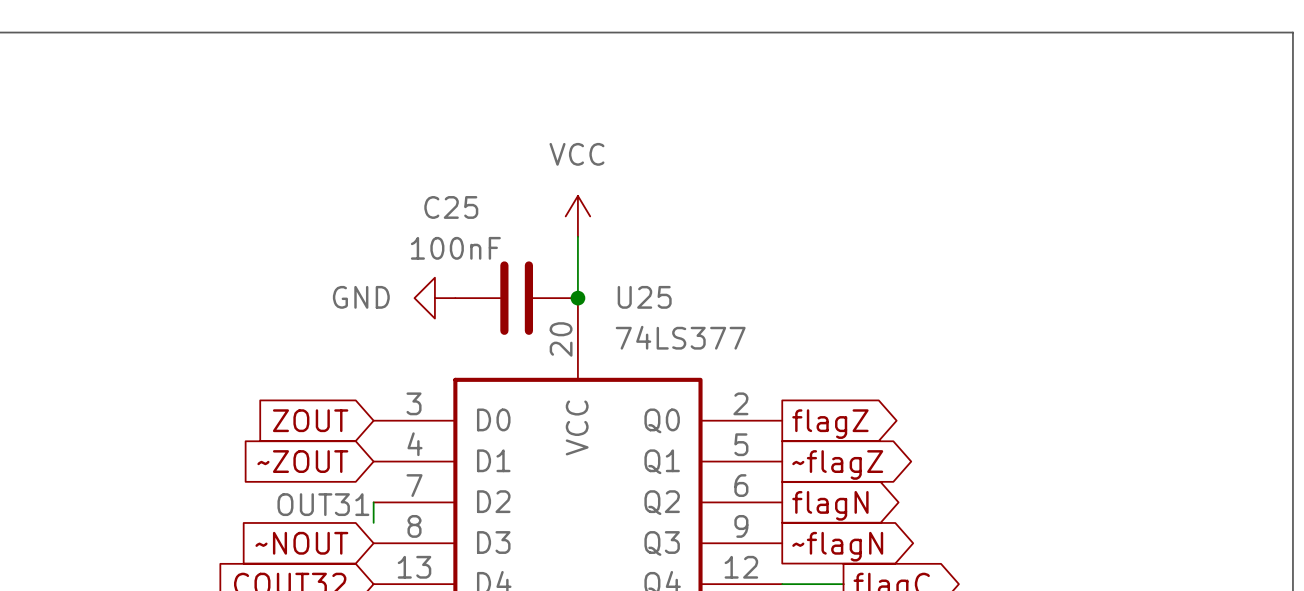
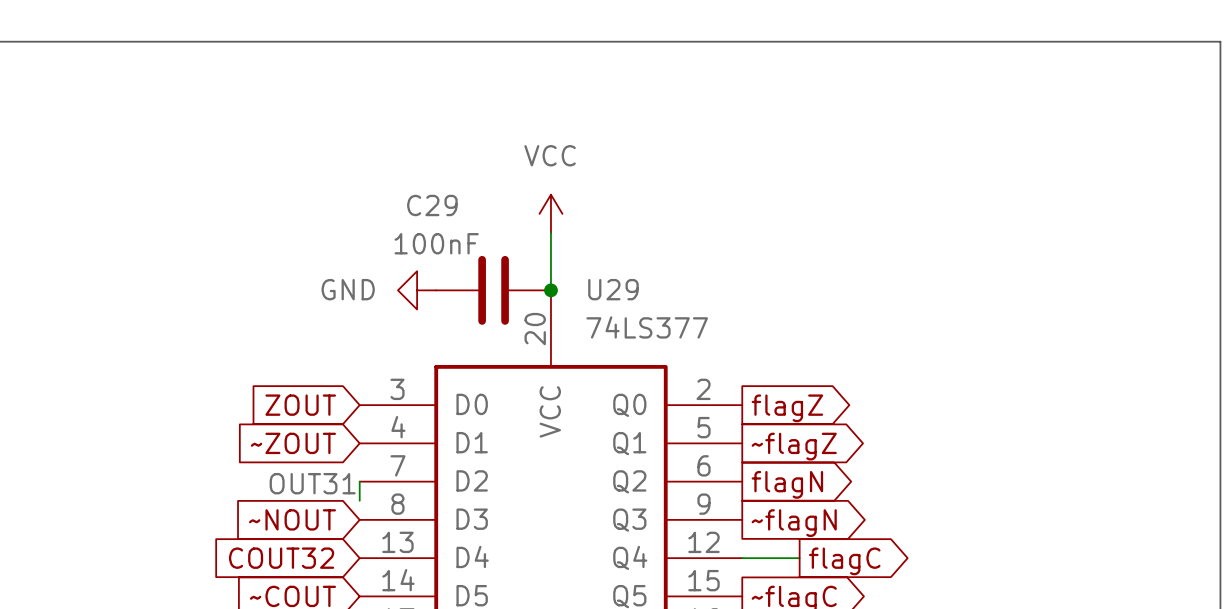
C25 name: C25 (451, 207) -> C29 (432, 205)
U25 name: U25 (644, 297) -> U29 (613, 289)

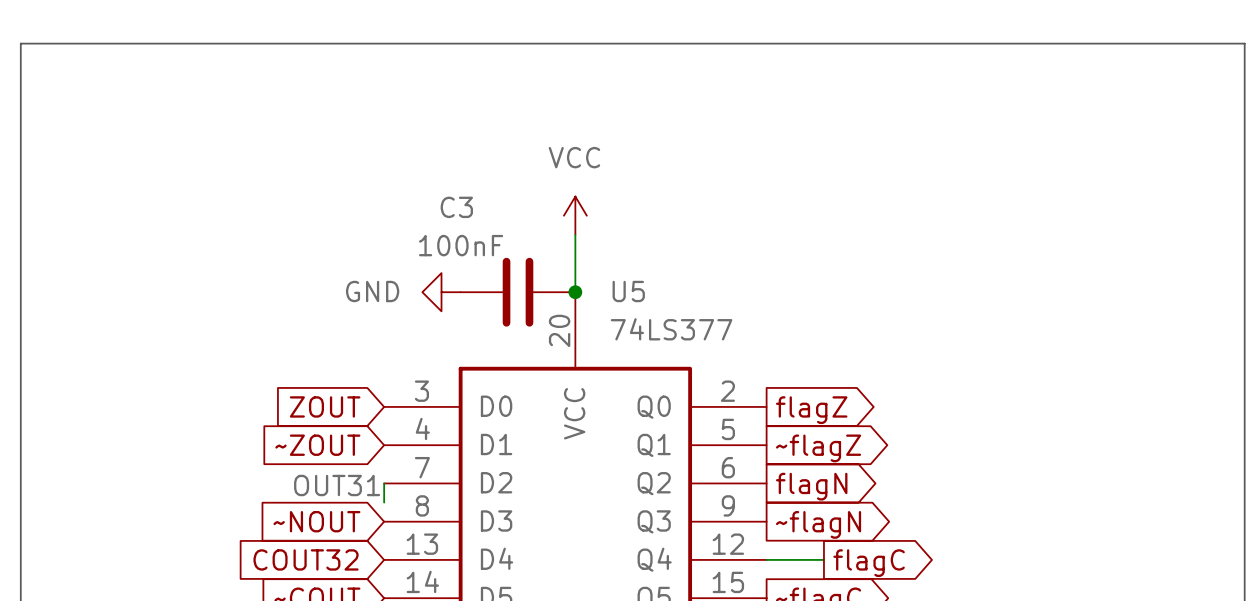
C29 name: C29 (432, 205) -> C3 (456, 207)
U29 name: U29 (613, 289) -> U5 (628, 291)

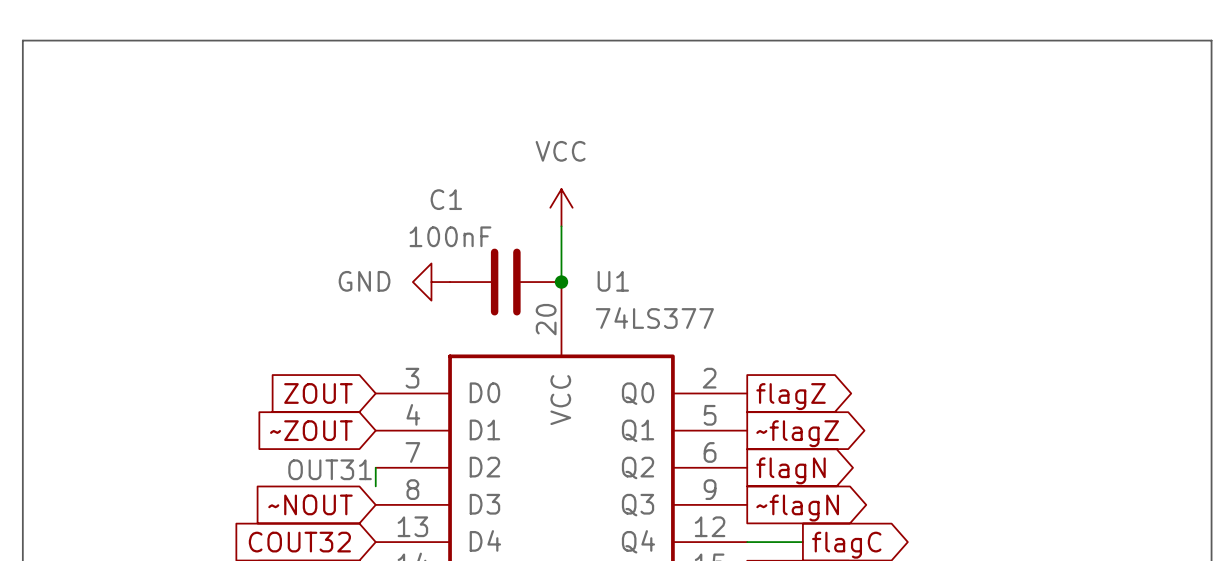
C3 name: C3 (456, 207) -> C1 (446, 199)
U5 name: U5 (628, 291) -> U1 (613, 281)

